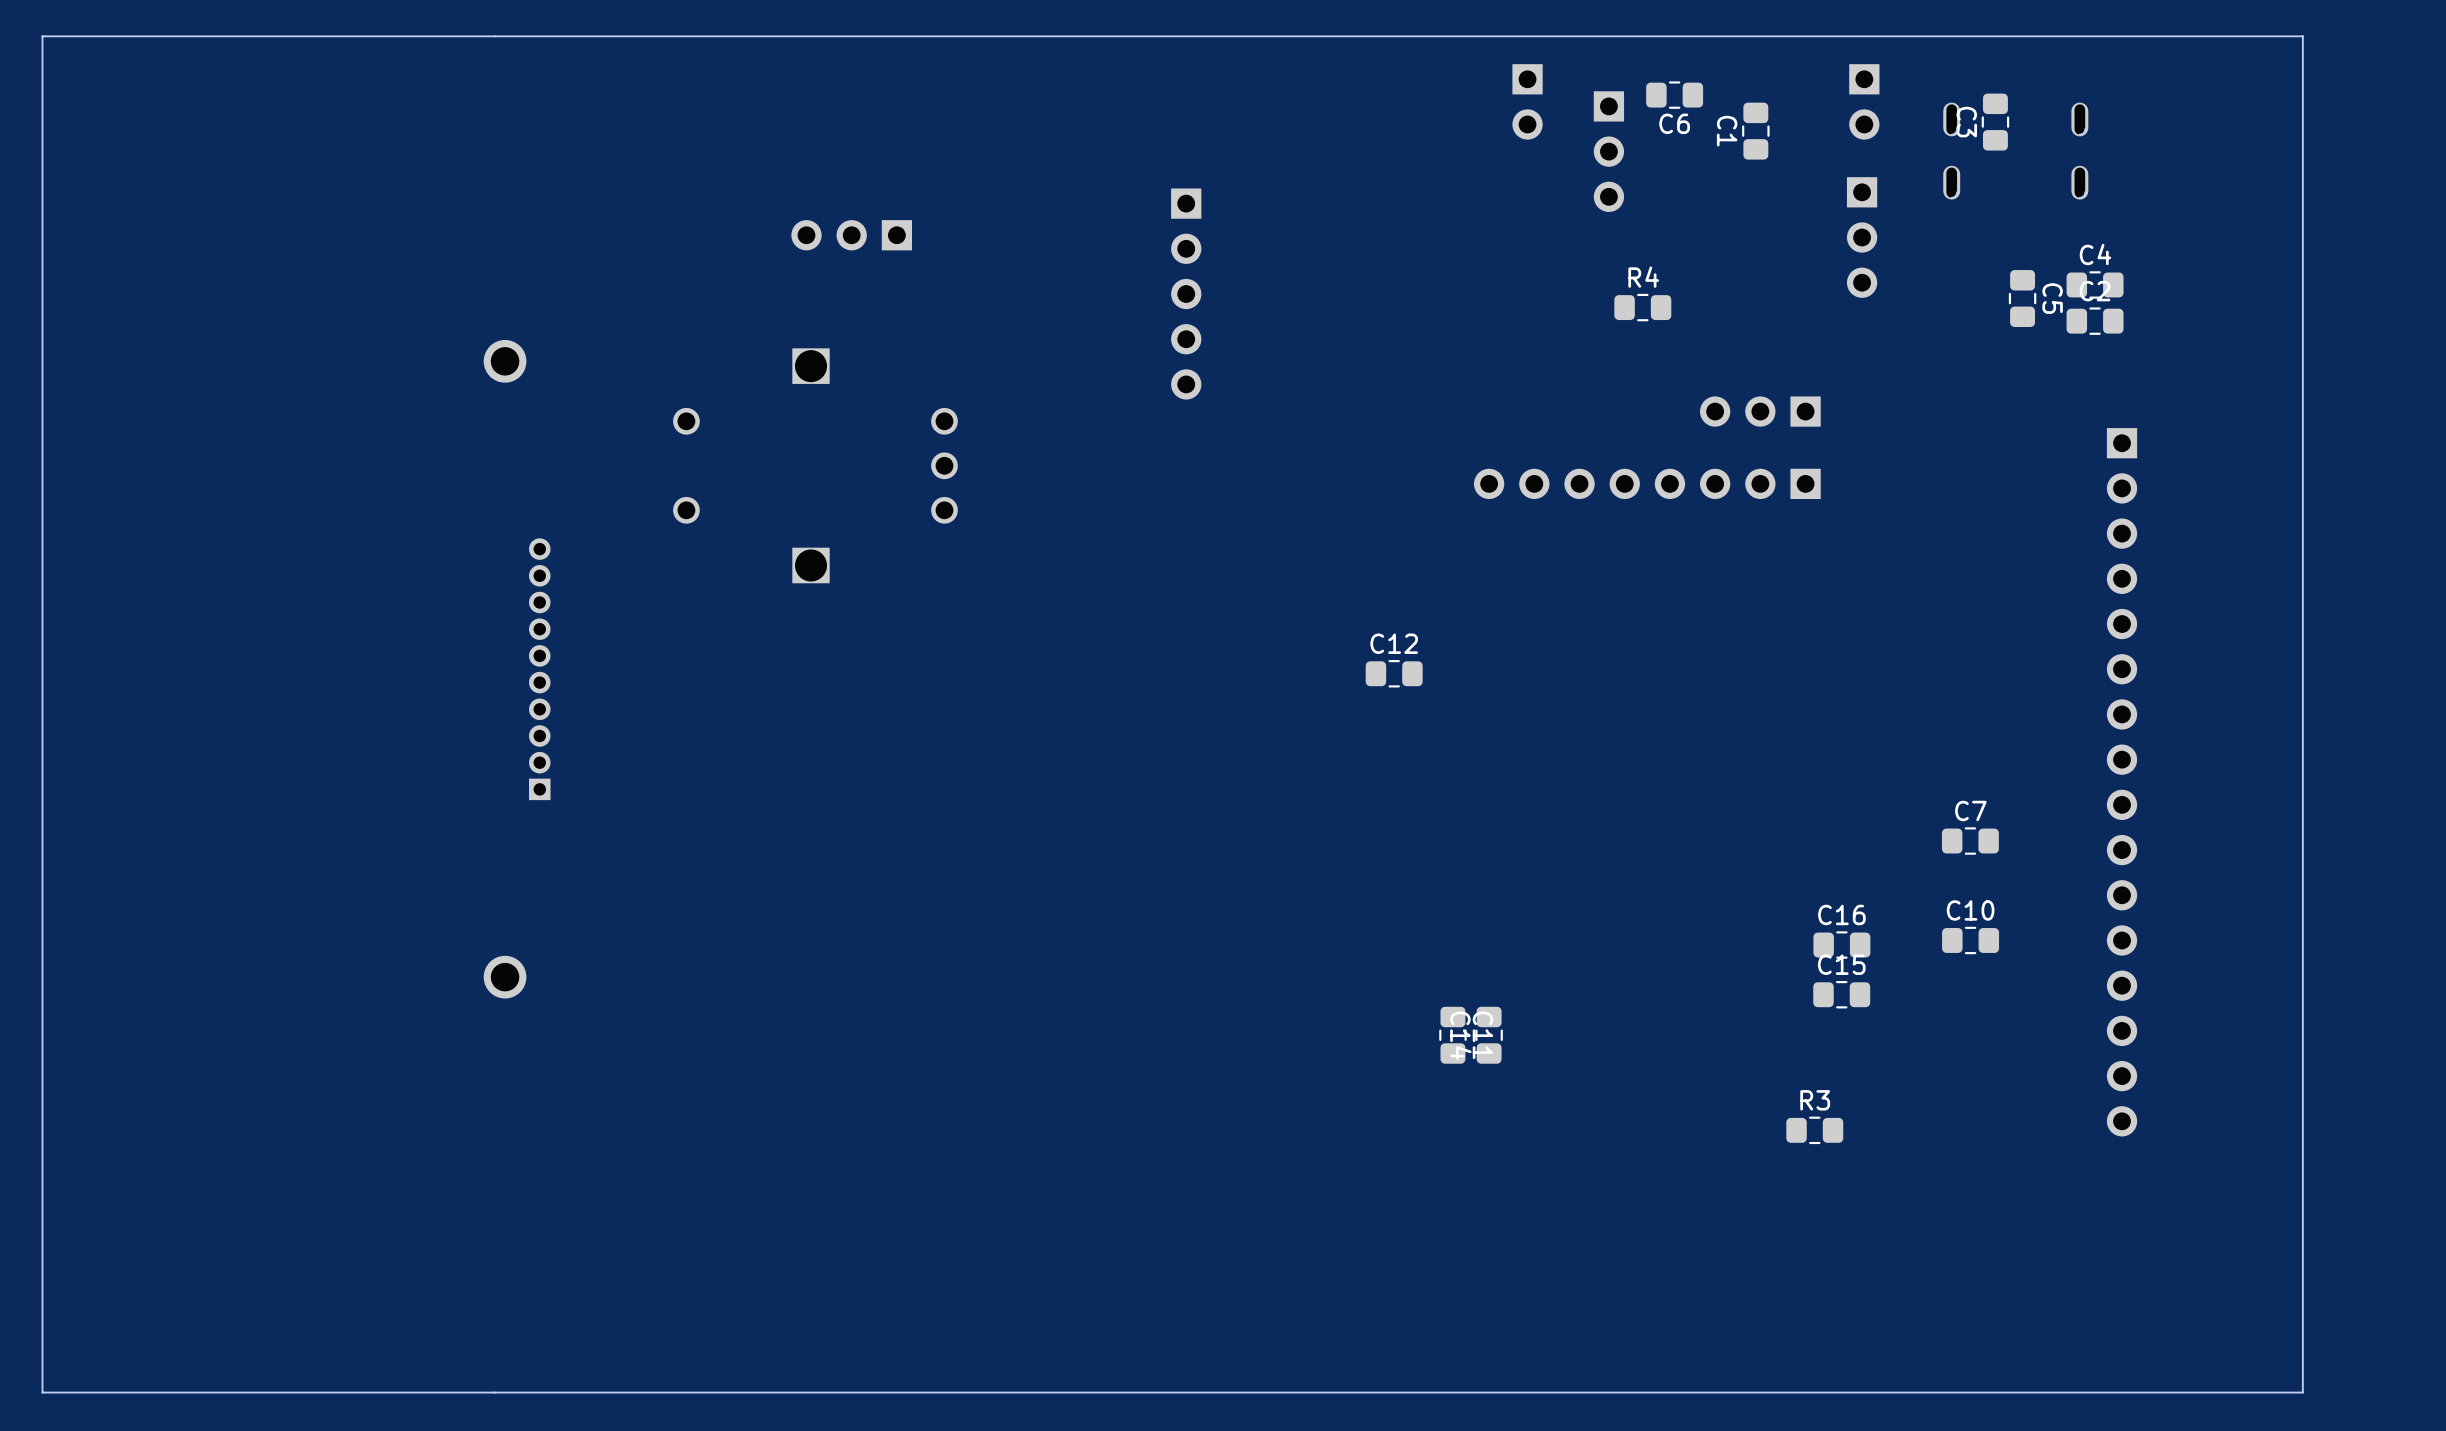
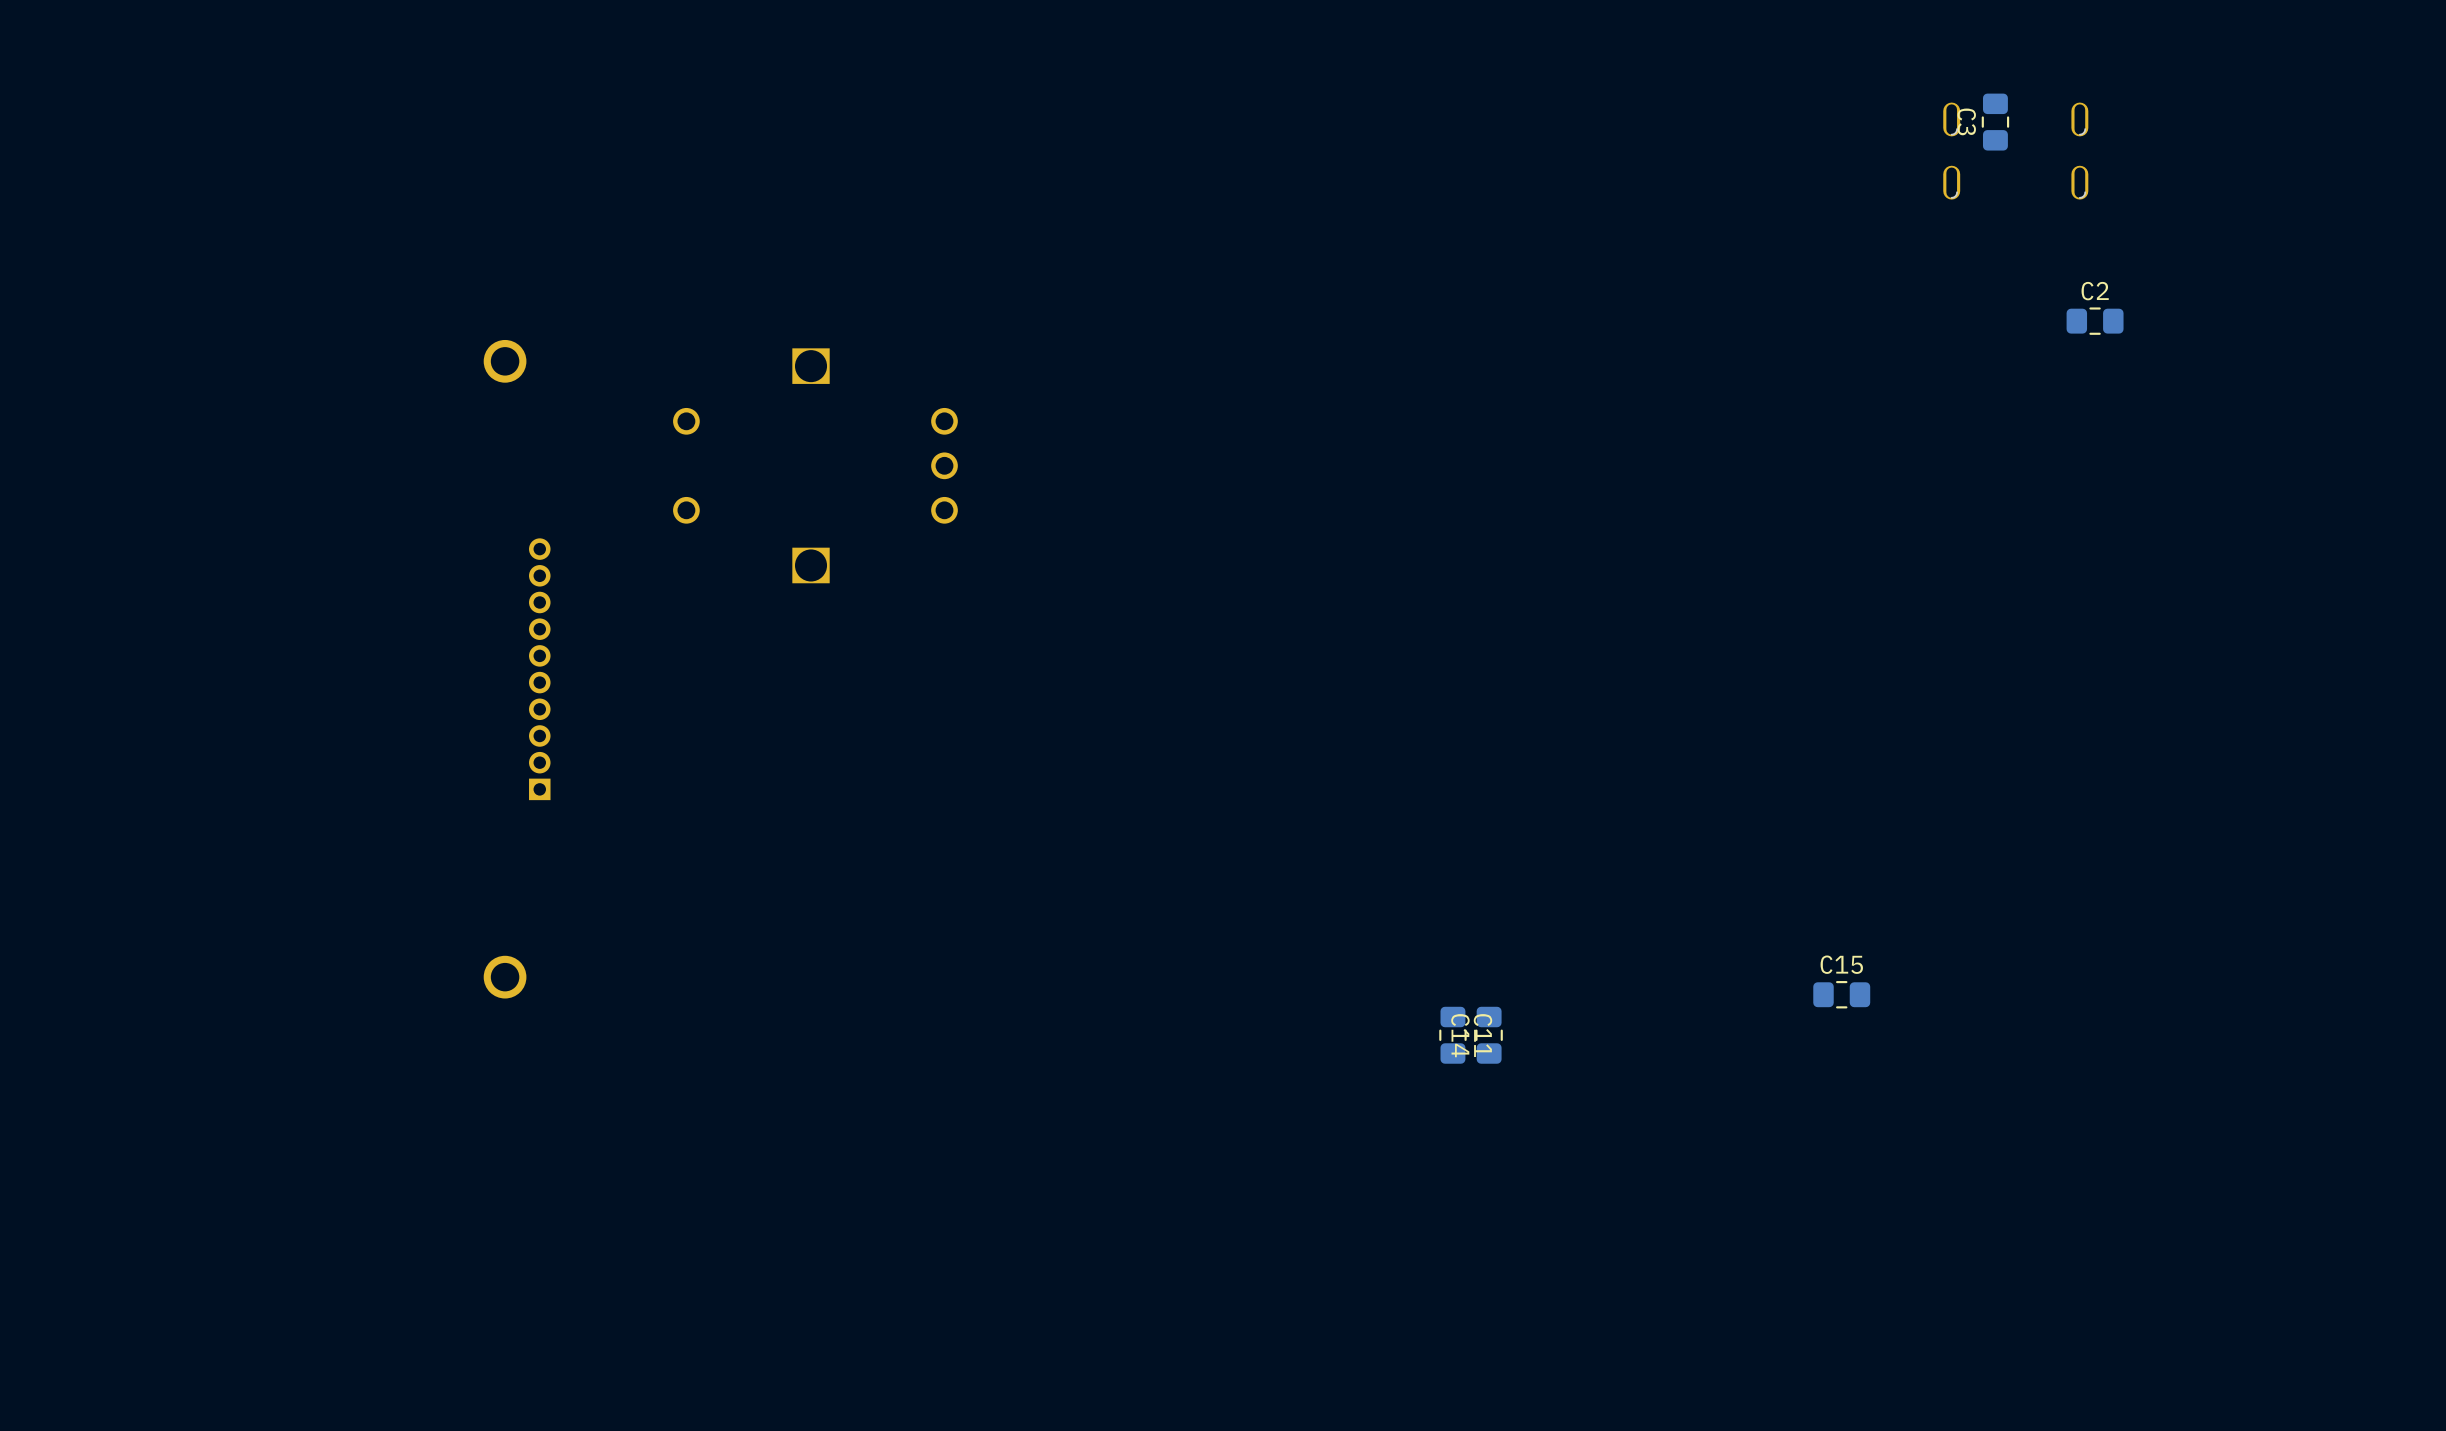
board edge: (2302, 36) (2302, 1392) (42, 1392) (42, 36) (2302, 36) -> none
C6: (1674, 95) -> none
part: (1527, 101) -> none
part: (1864, 101) -> none
C1: (1755, 131) -> none
part: (1608, 151) -> none
part: (851, 235) -> none
part: (1862, 237) -> none
C4: (2095, 284) -> none
part: (1186, 294) -> none
C5: (2022, 298) -> none
R4: (1642, 307) -> none
part: (1760, 411) -> none
part: (1647, 483) -> none
C12: (1394, 673) -> none
part: (2122, 782) -> none
C7: (1970, 841) -> none
C10: (1970, 940) -> none
C16: (1841, 945) -> none
R3: (1814, 1130) -> none

